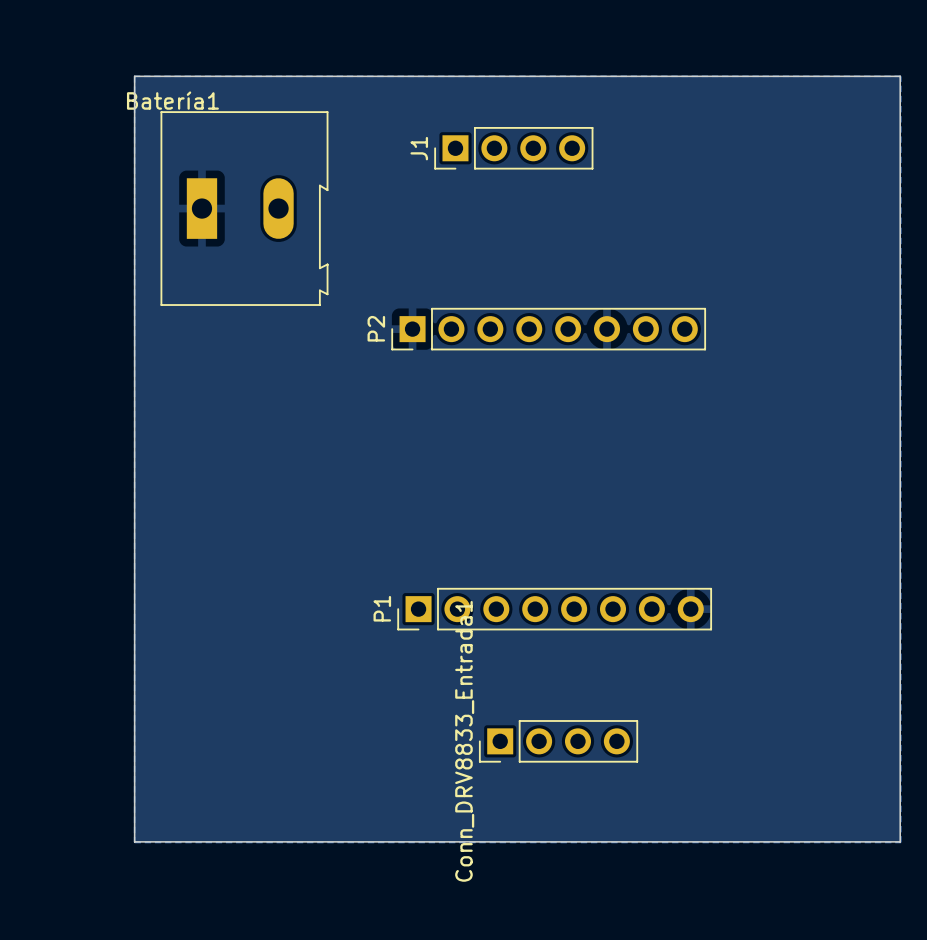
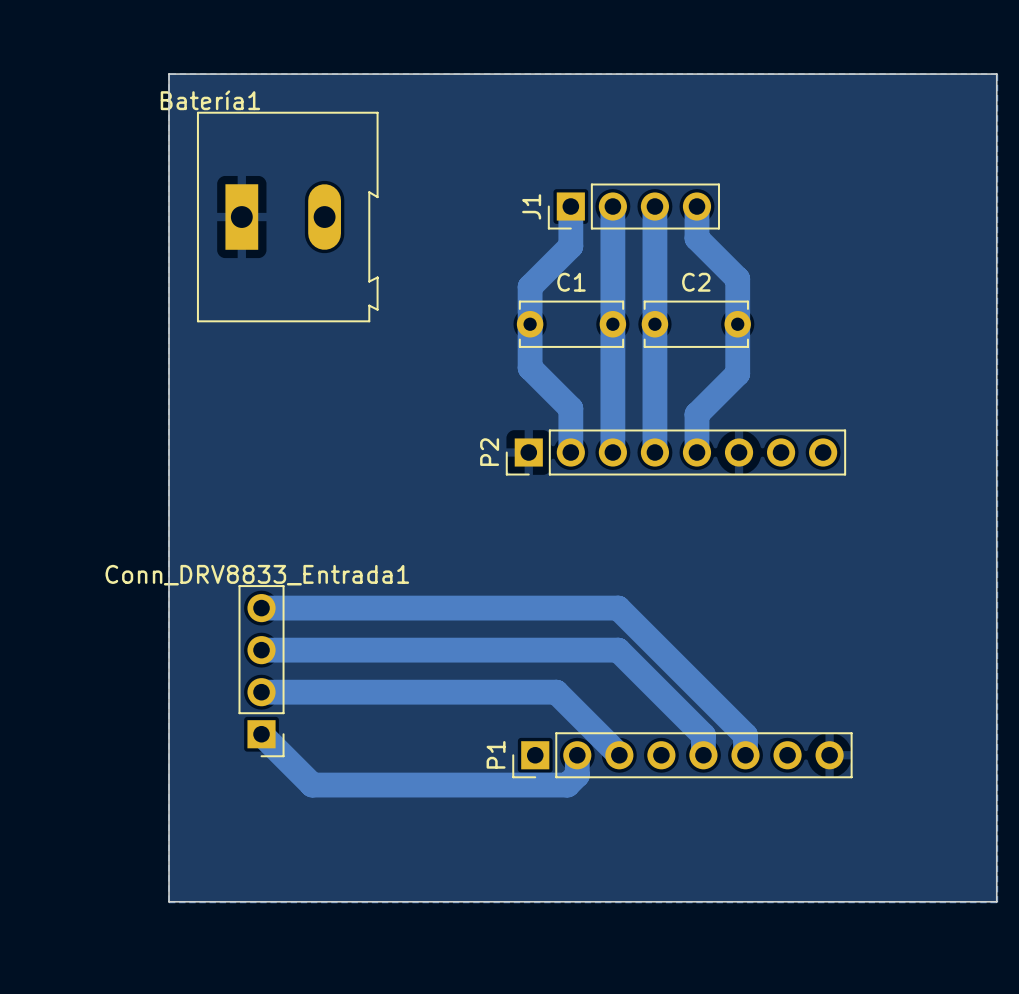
J1 position: (513, 148) -> (633, 206)
bottom track: none -> (570, 206) (570, 246) (530, 286) (530, 367) (570, 408) (570, 452)
bottom track: none -> (612, 206) (612, 452)
bottom track: none -> (654, 206) (654, 452)
bottom track: none -> (696, 206) (696, 238) (737, 279) (737, 373) (696, 414) (696, 452)
C1: none -> (571, 324)
C2: none -> (696, 324)
P2 position: (548, 329) -> (675, 452)
bottom track: none -> (261, 608) (618, 608) (745, 735) (745, 755)
bottom track: none -> (261, 650) (618, 650) (703, 735) (703, 755)
P1 position: (554, 609) -> (682, 755)
bottom track: none -> (261, 692) (556, 692) (619, 755)
bottom track: none -> (261, 734) (312, 785) (567, 785) (577, 775) (577, 755)
Conn_DRV8833_Entrada1 name position: Conn_DRV8833_Entrada1 (464, 741) -> Conn_DRV8833_Entrada1 (257, 575)
Conn_DRV8833_Entrada1 rotation: 0° (558, 741) -> 90° counterclockwise (261, 671)
Conn_DRV8833_Entrada1 position: (558, 741) -> (261, 671)

